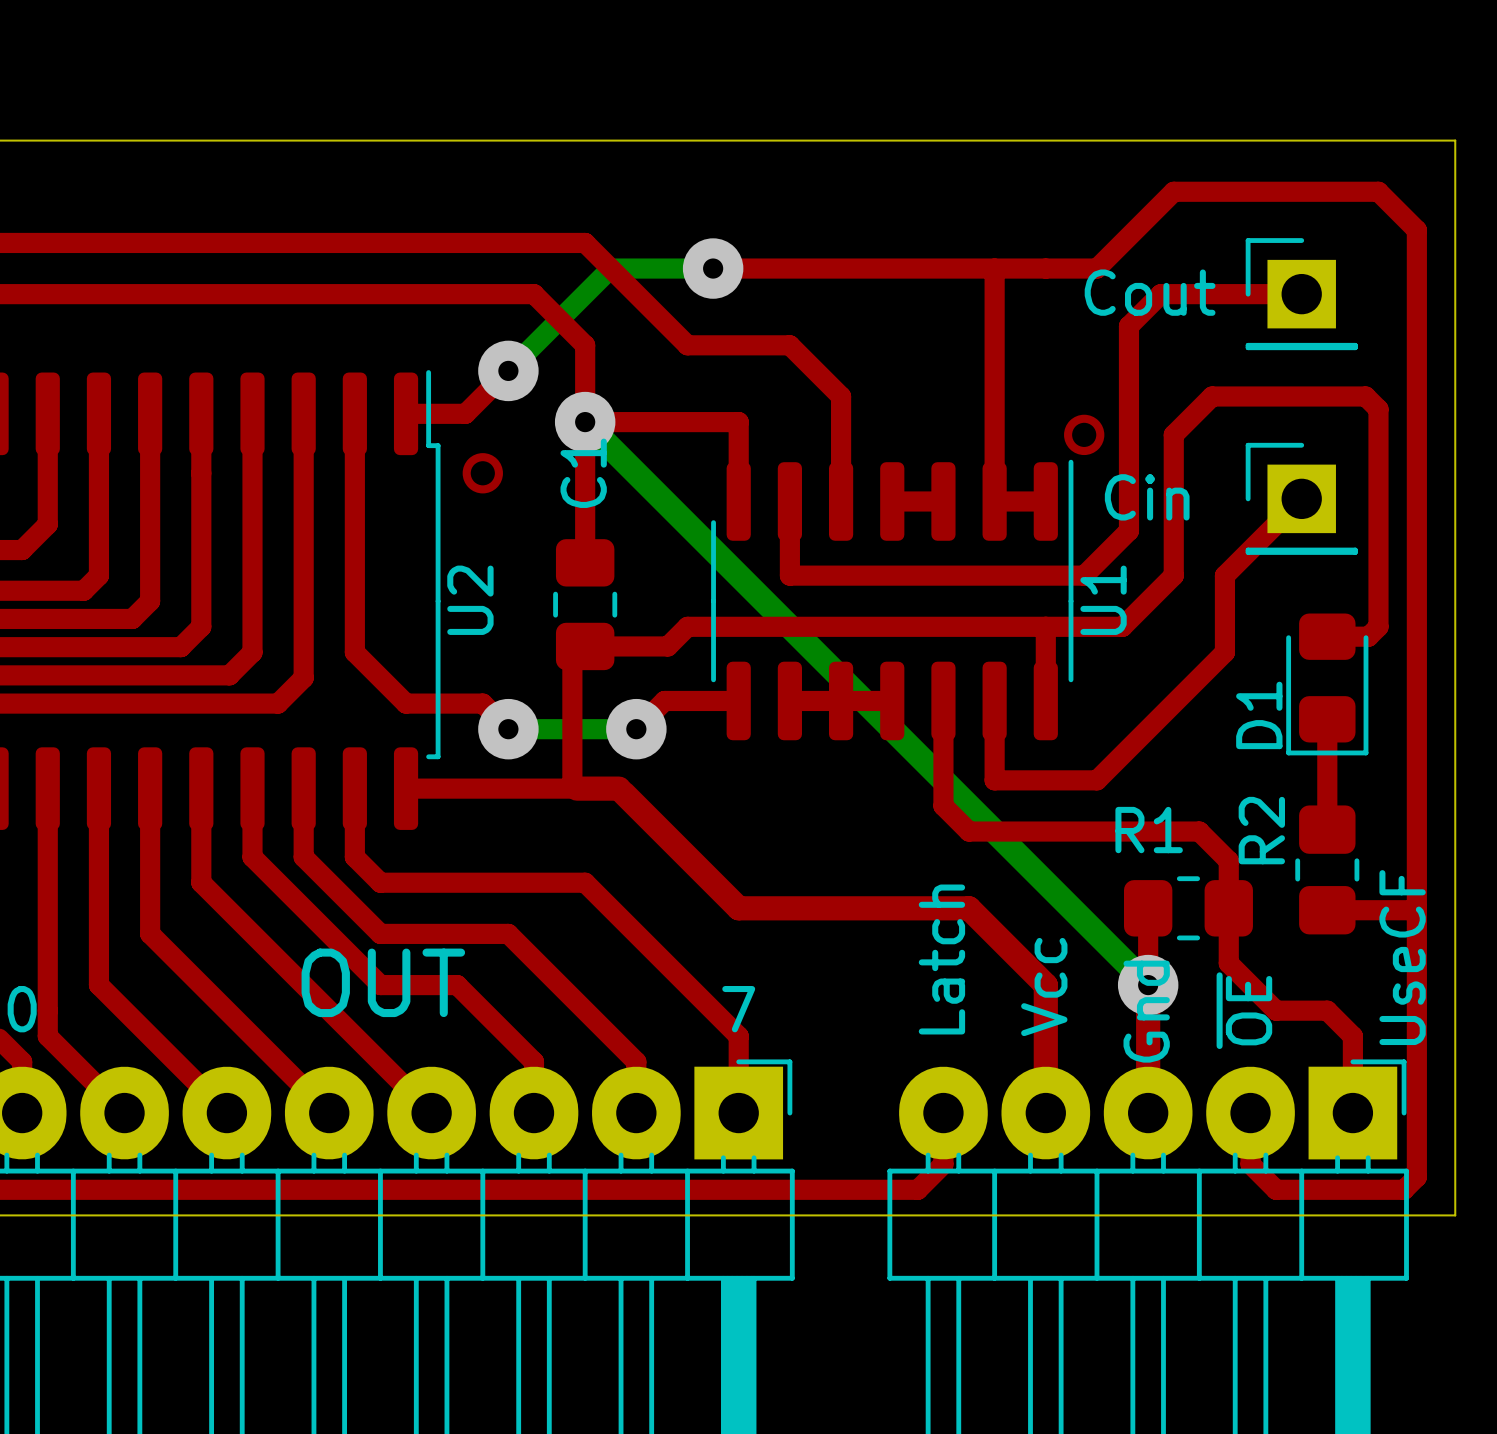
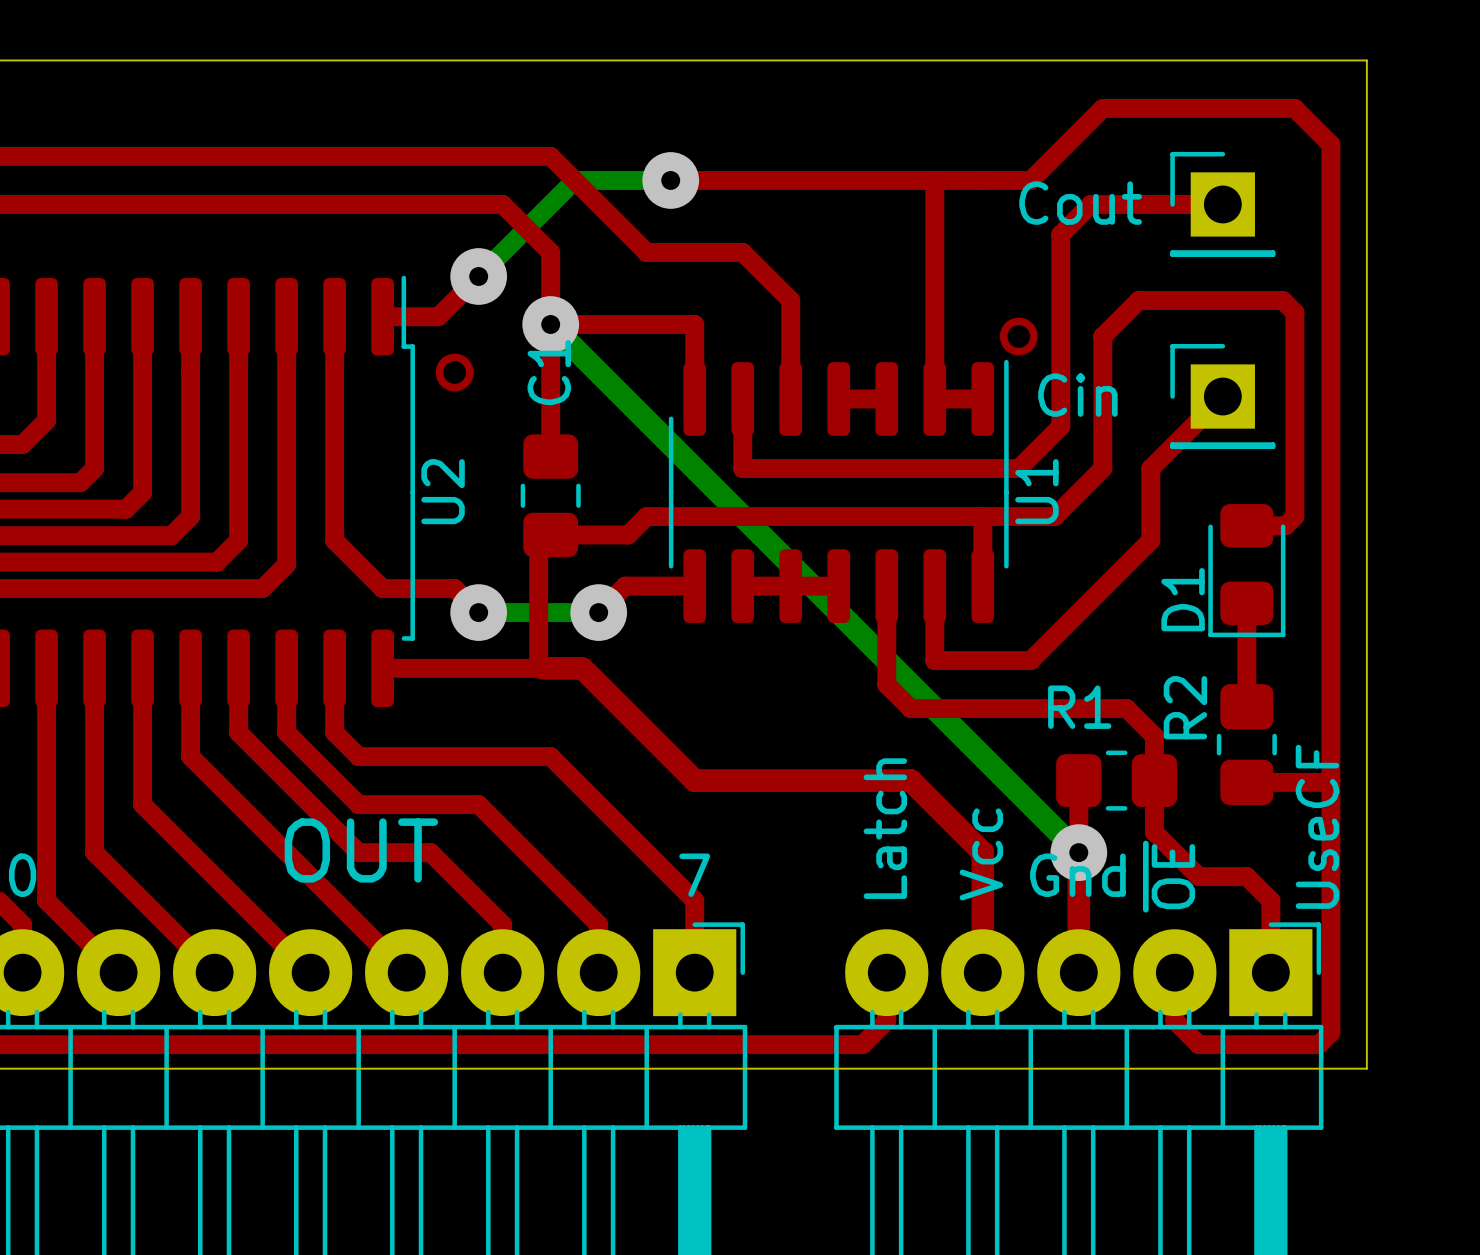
text rotation: 0° (1146, 1011) -> 90° clockwise (1077, 875)

